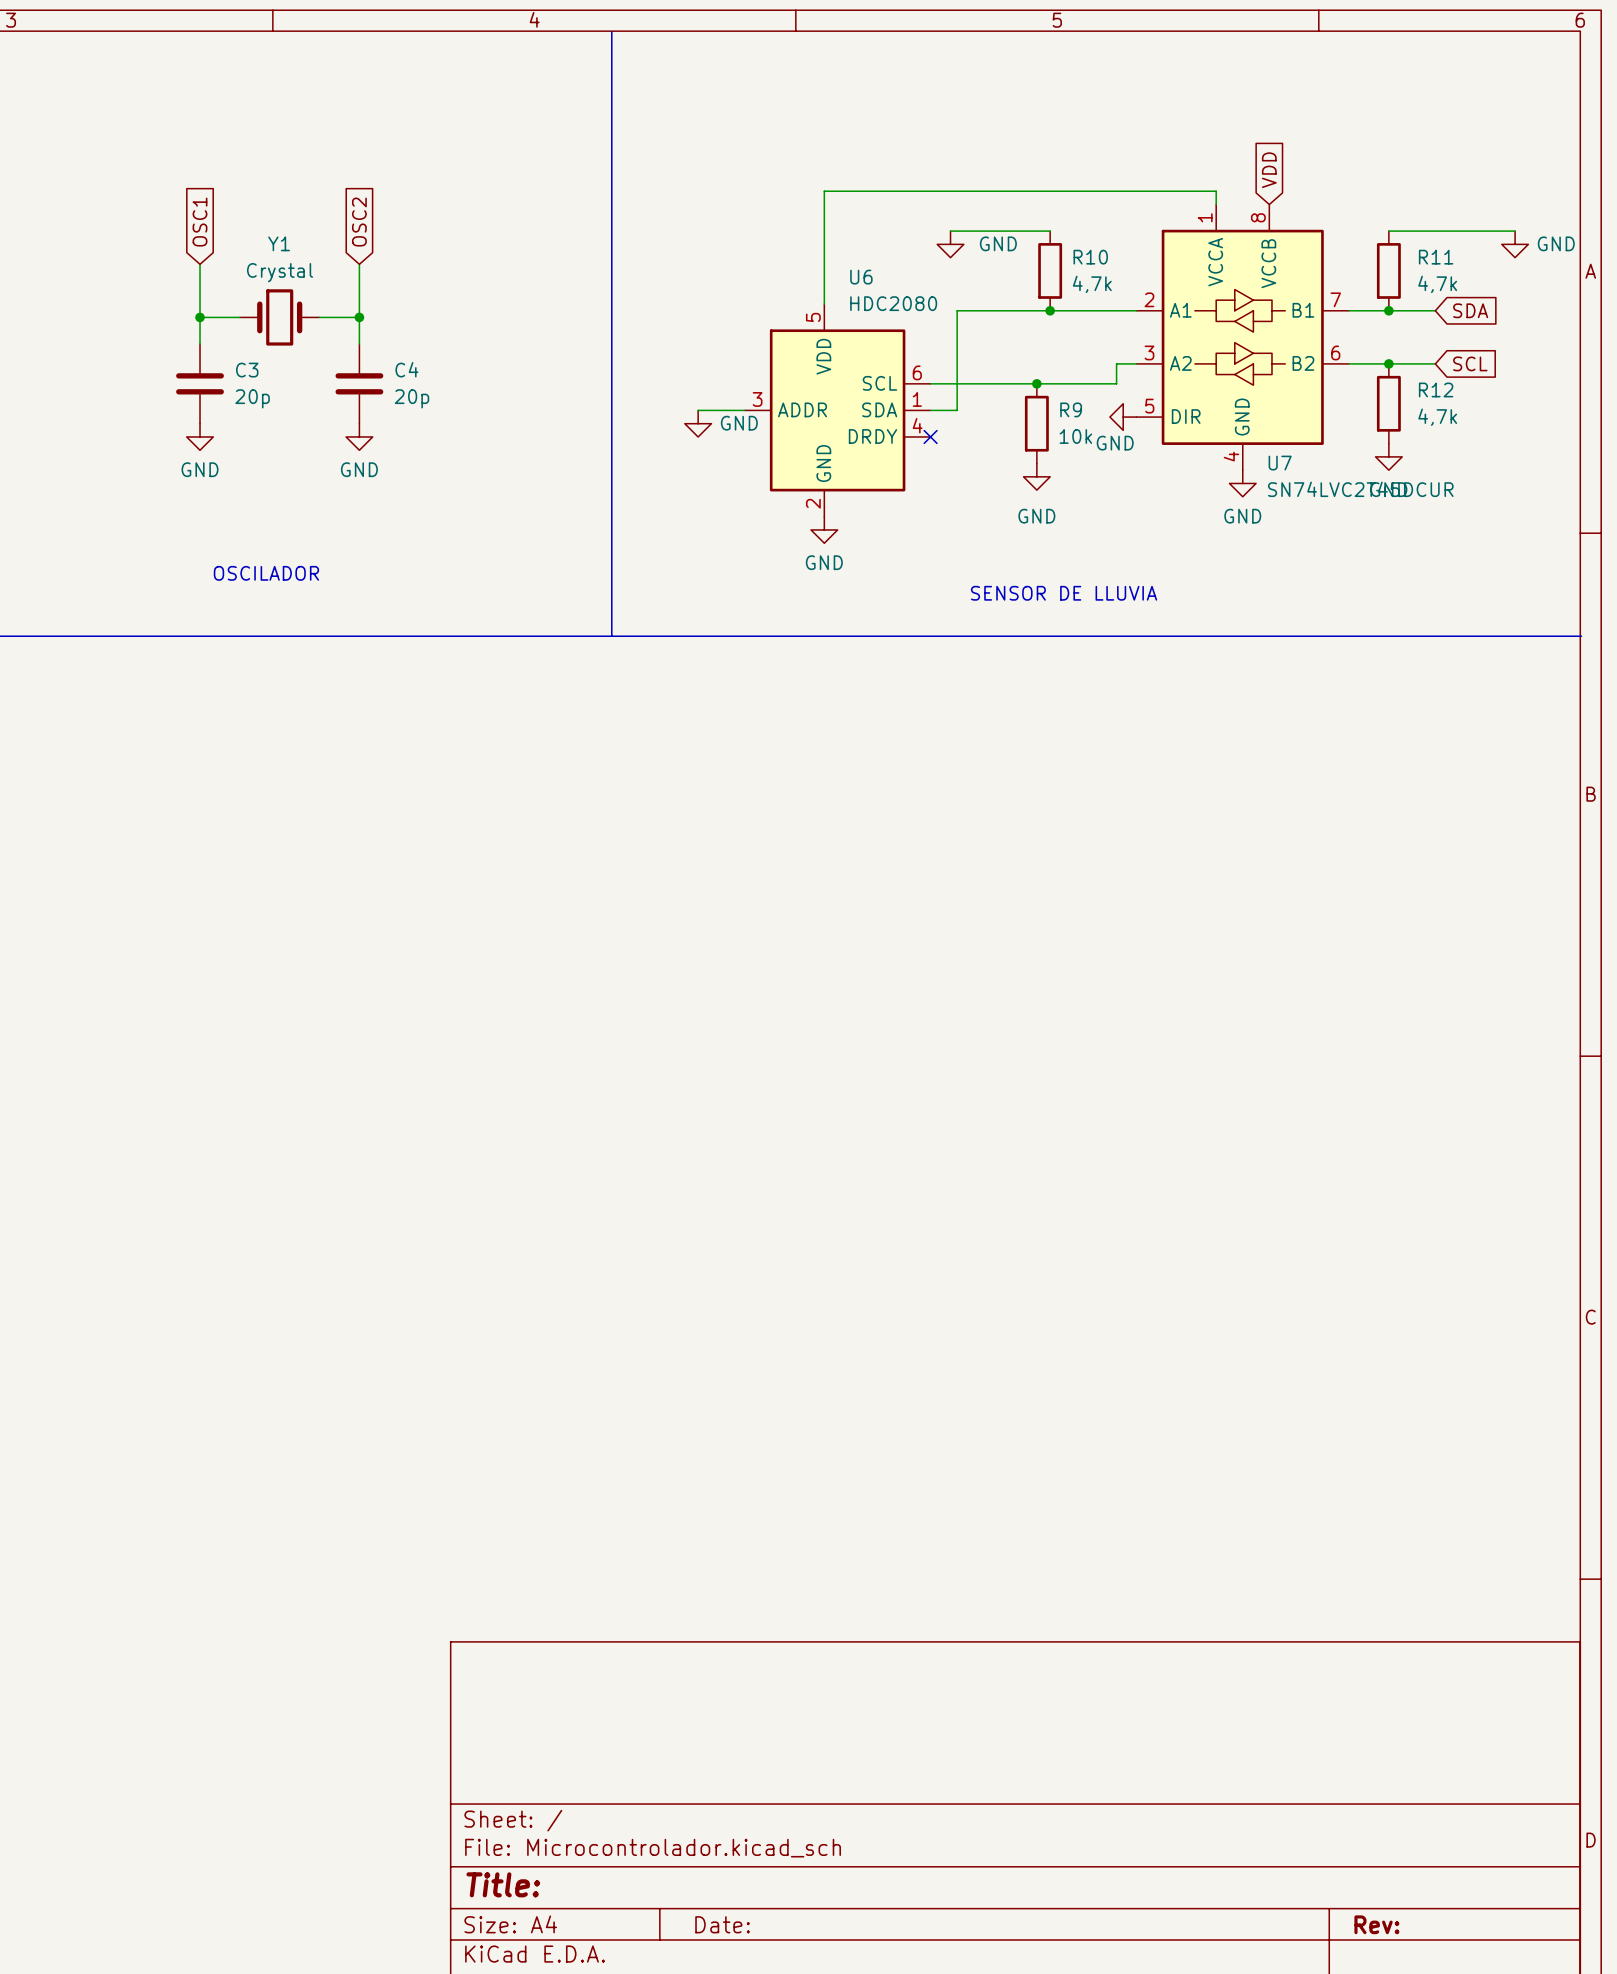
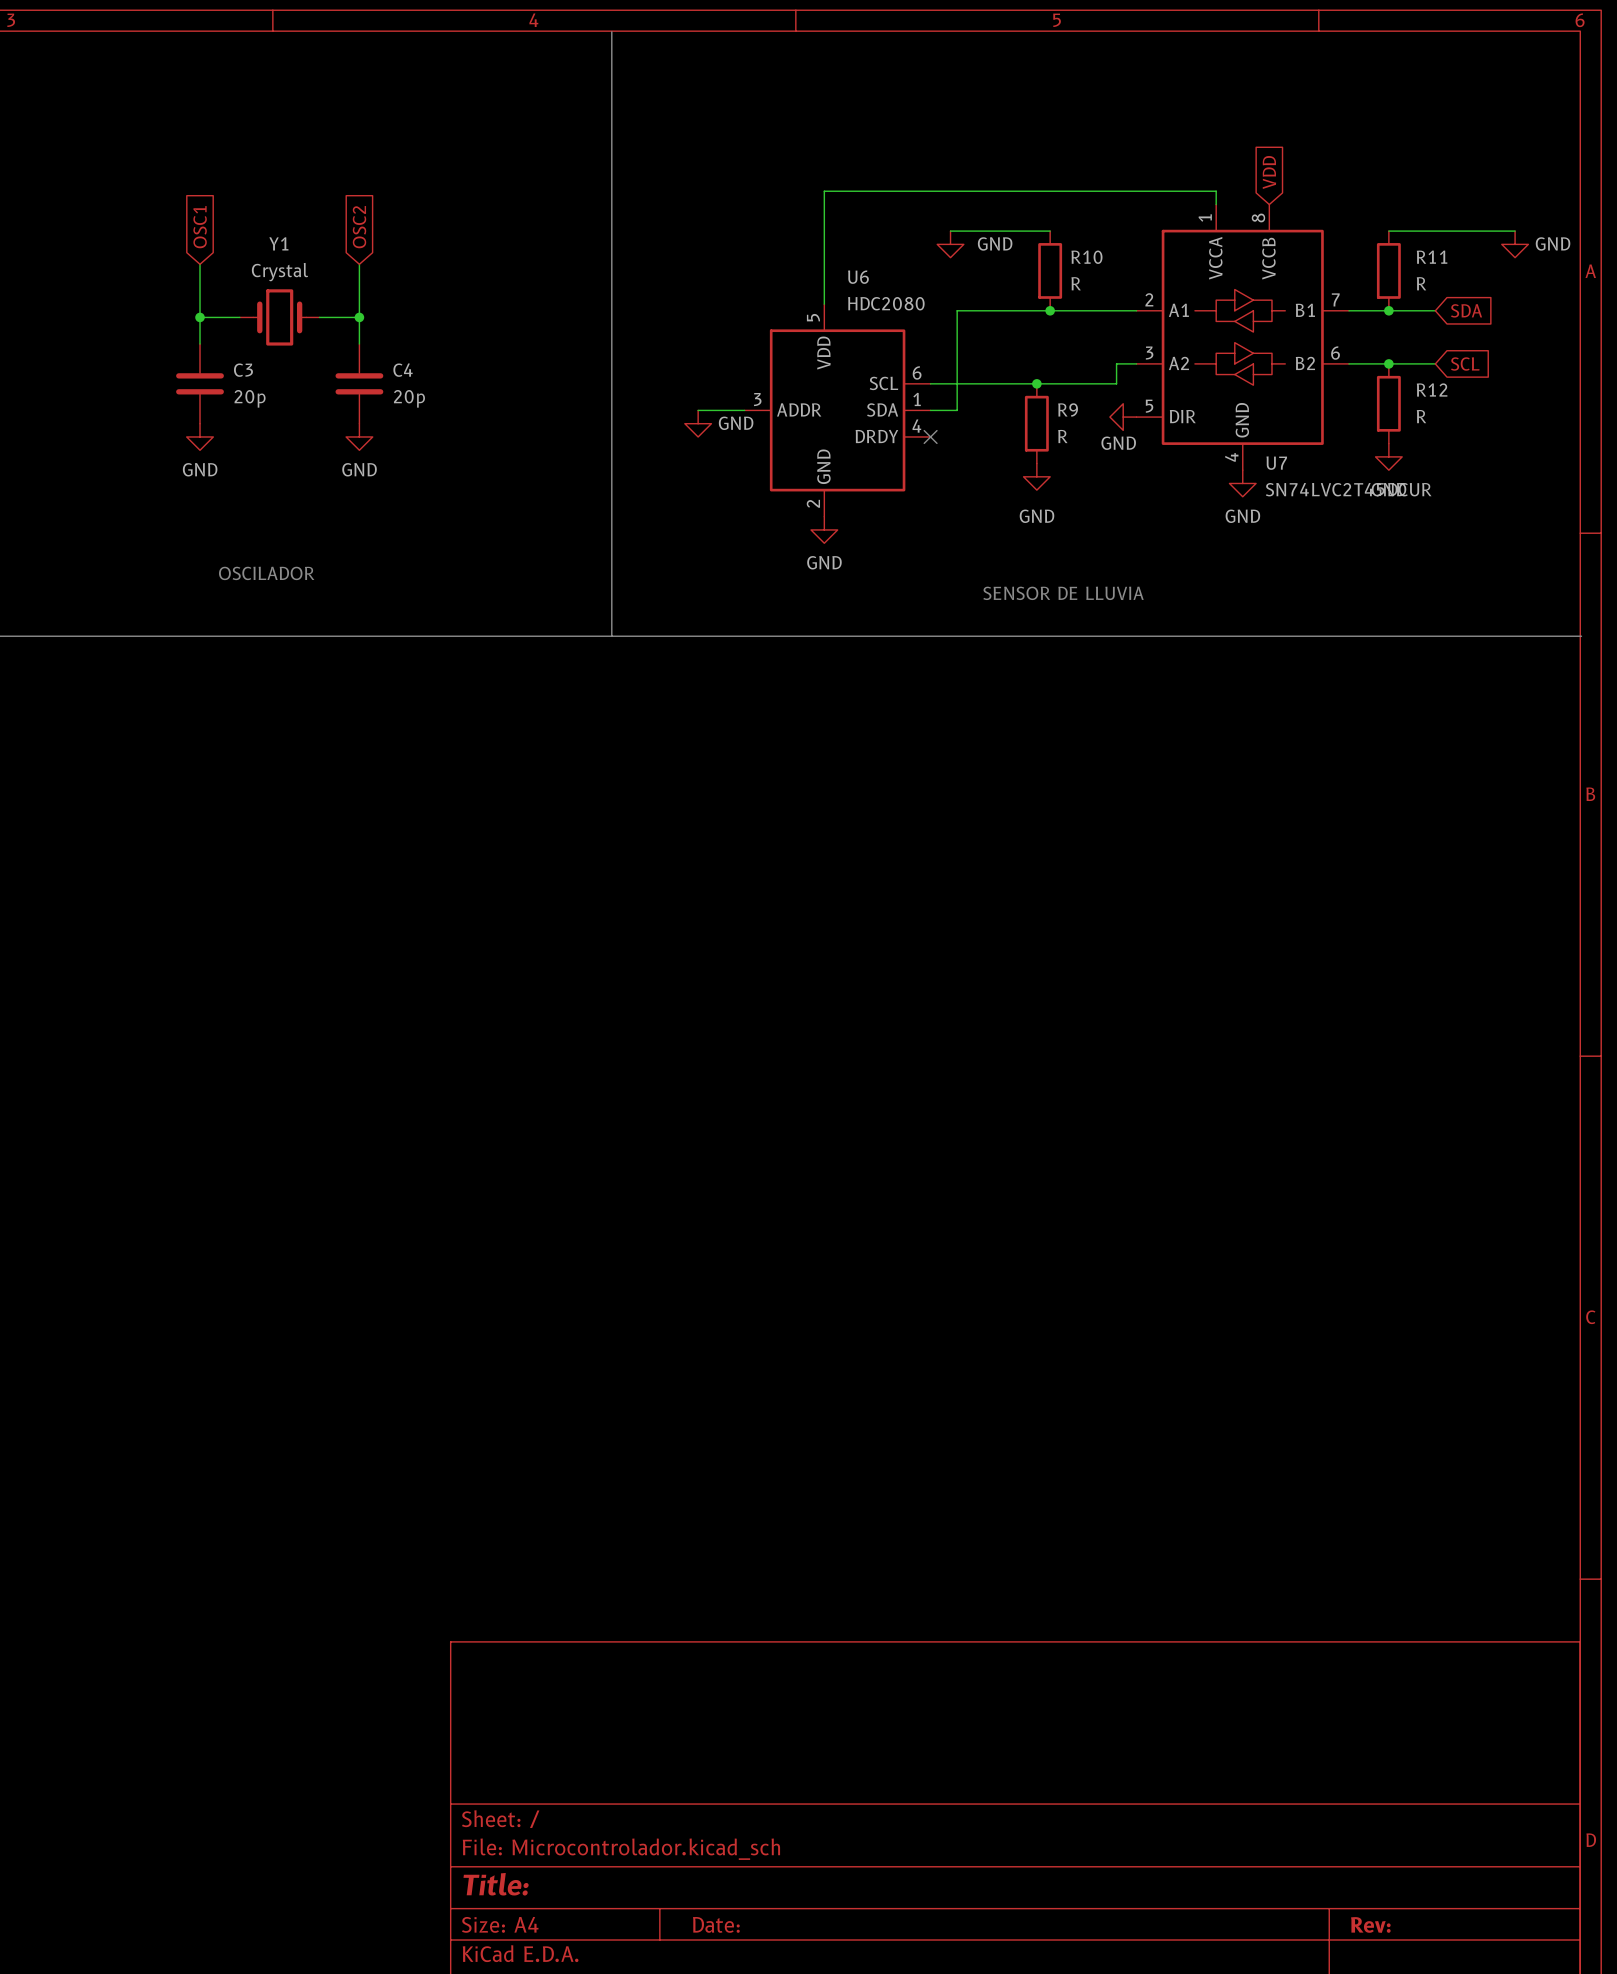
R10 value: 4,7k (1092, 284) -> R (1076, 283)
R11 value: 4,7k (1437, 284) -> R (1421, 283)
R12 value: 4,7k (1437, 417) -> R (1421, 416)
R9 value: 10k (1075, 436) -> R (1062, 436)

